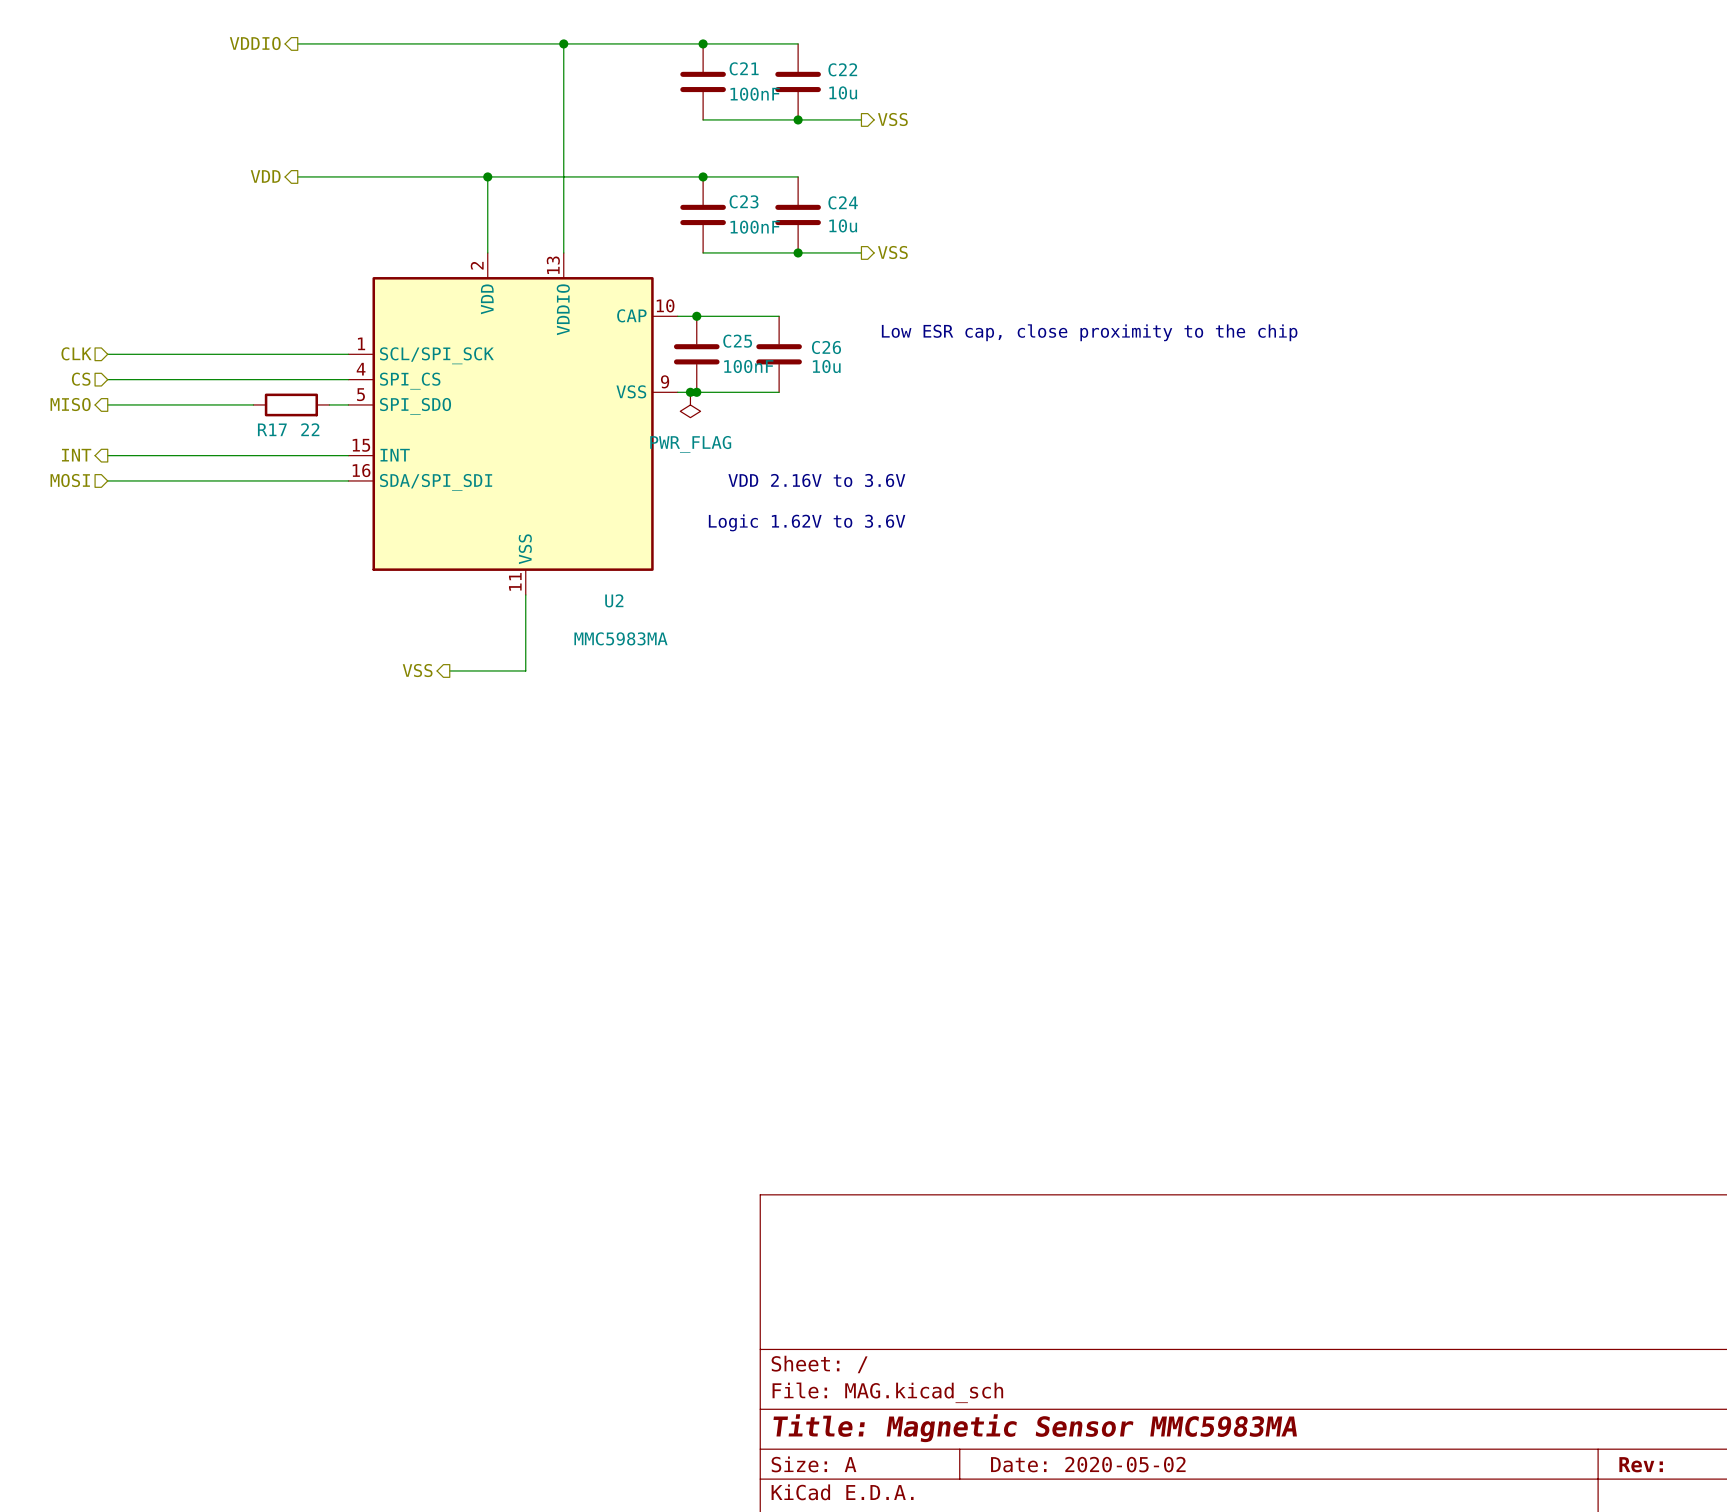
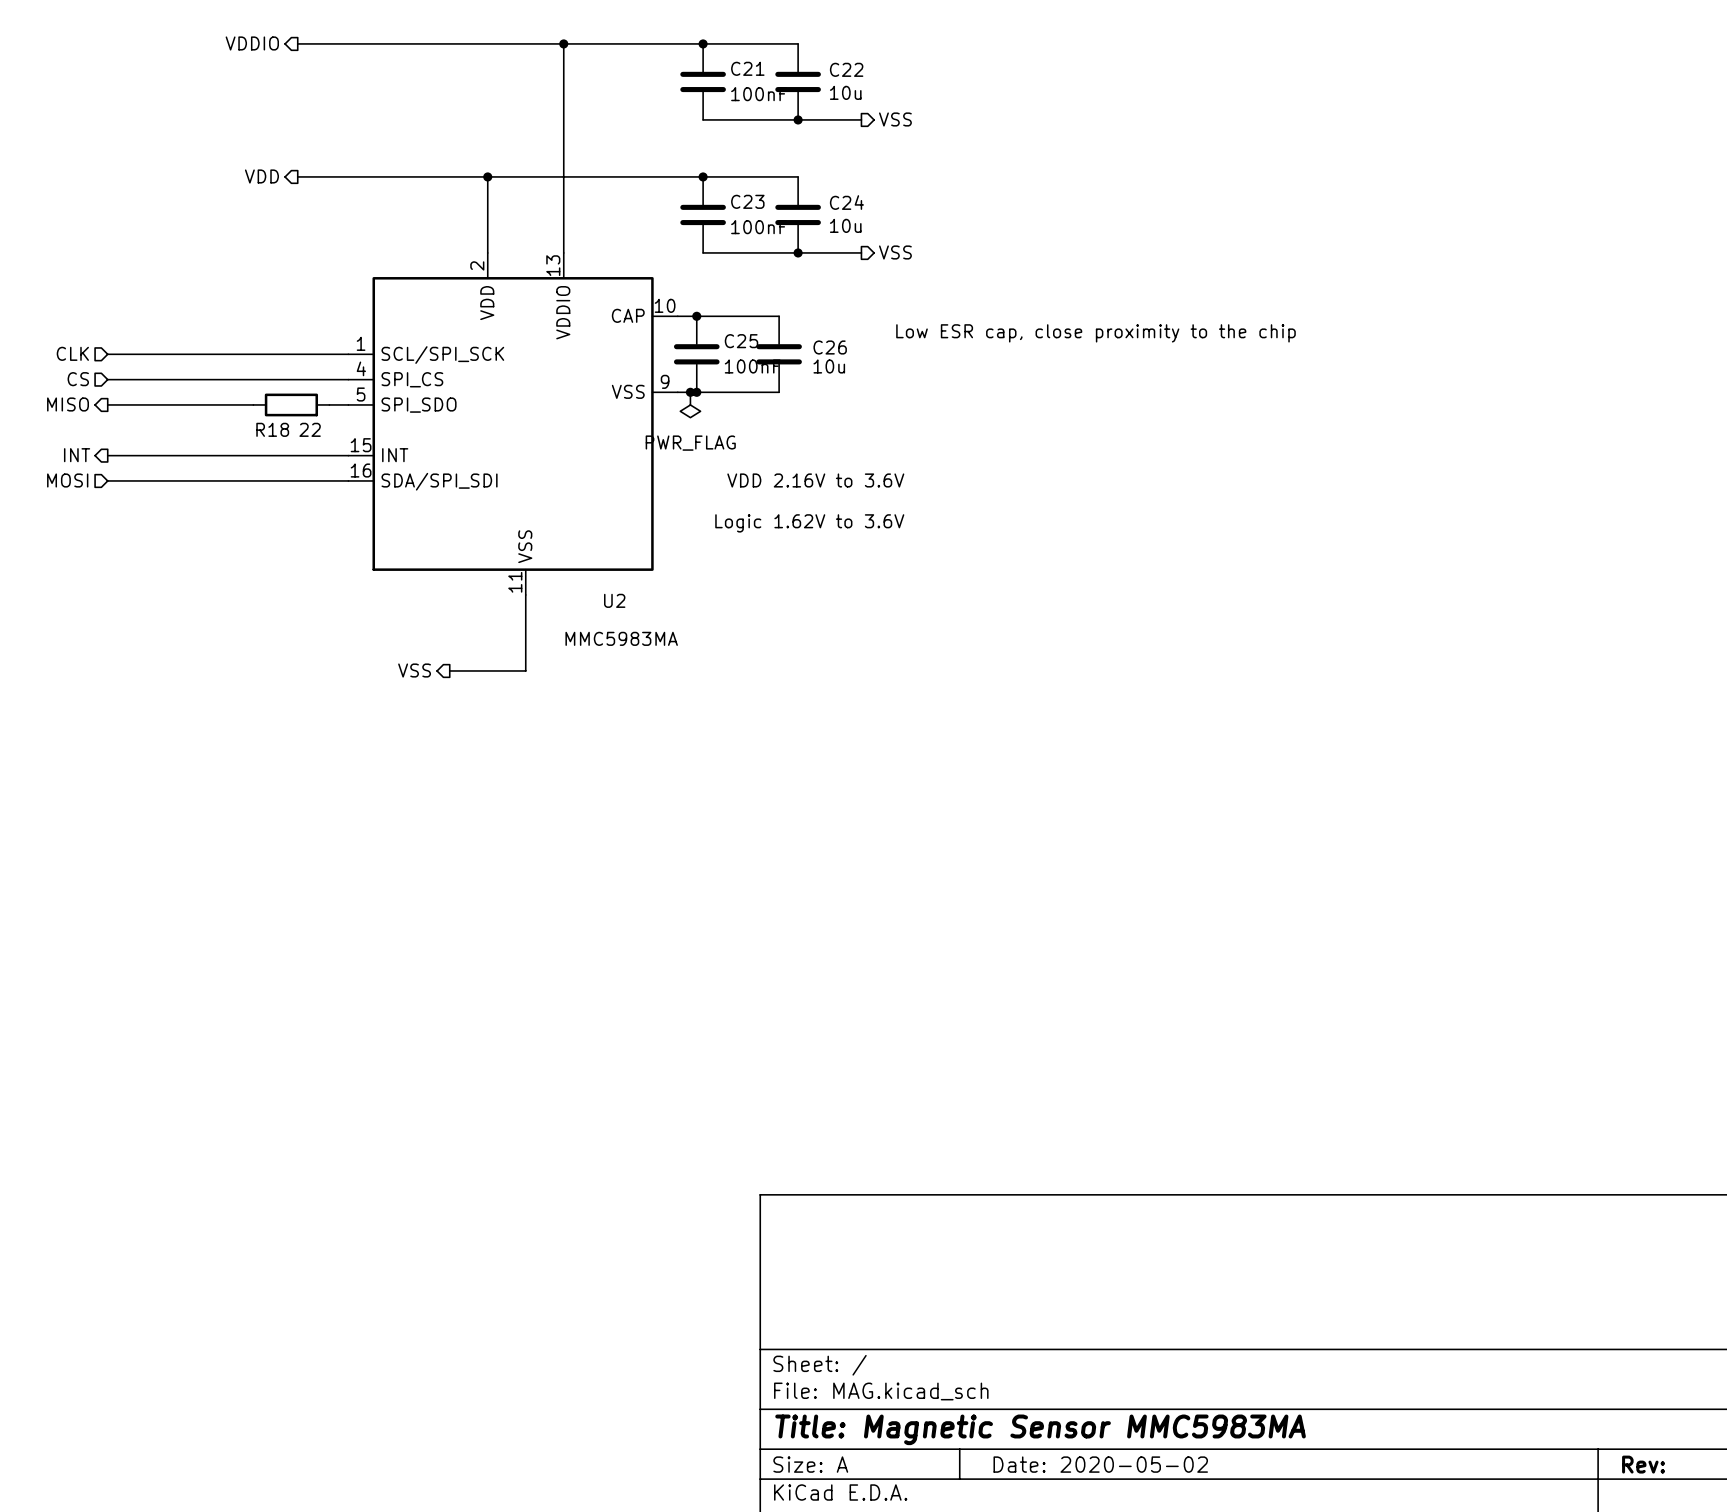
R17 name: R17 (272, 429) -> R18 (272, 429)

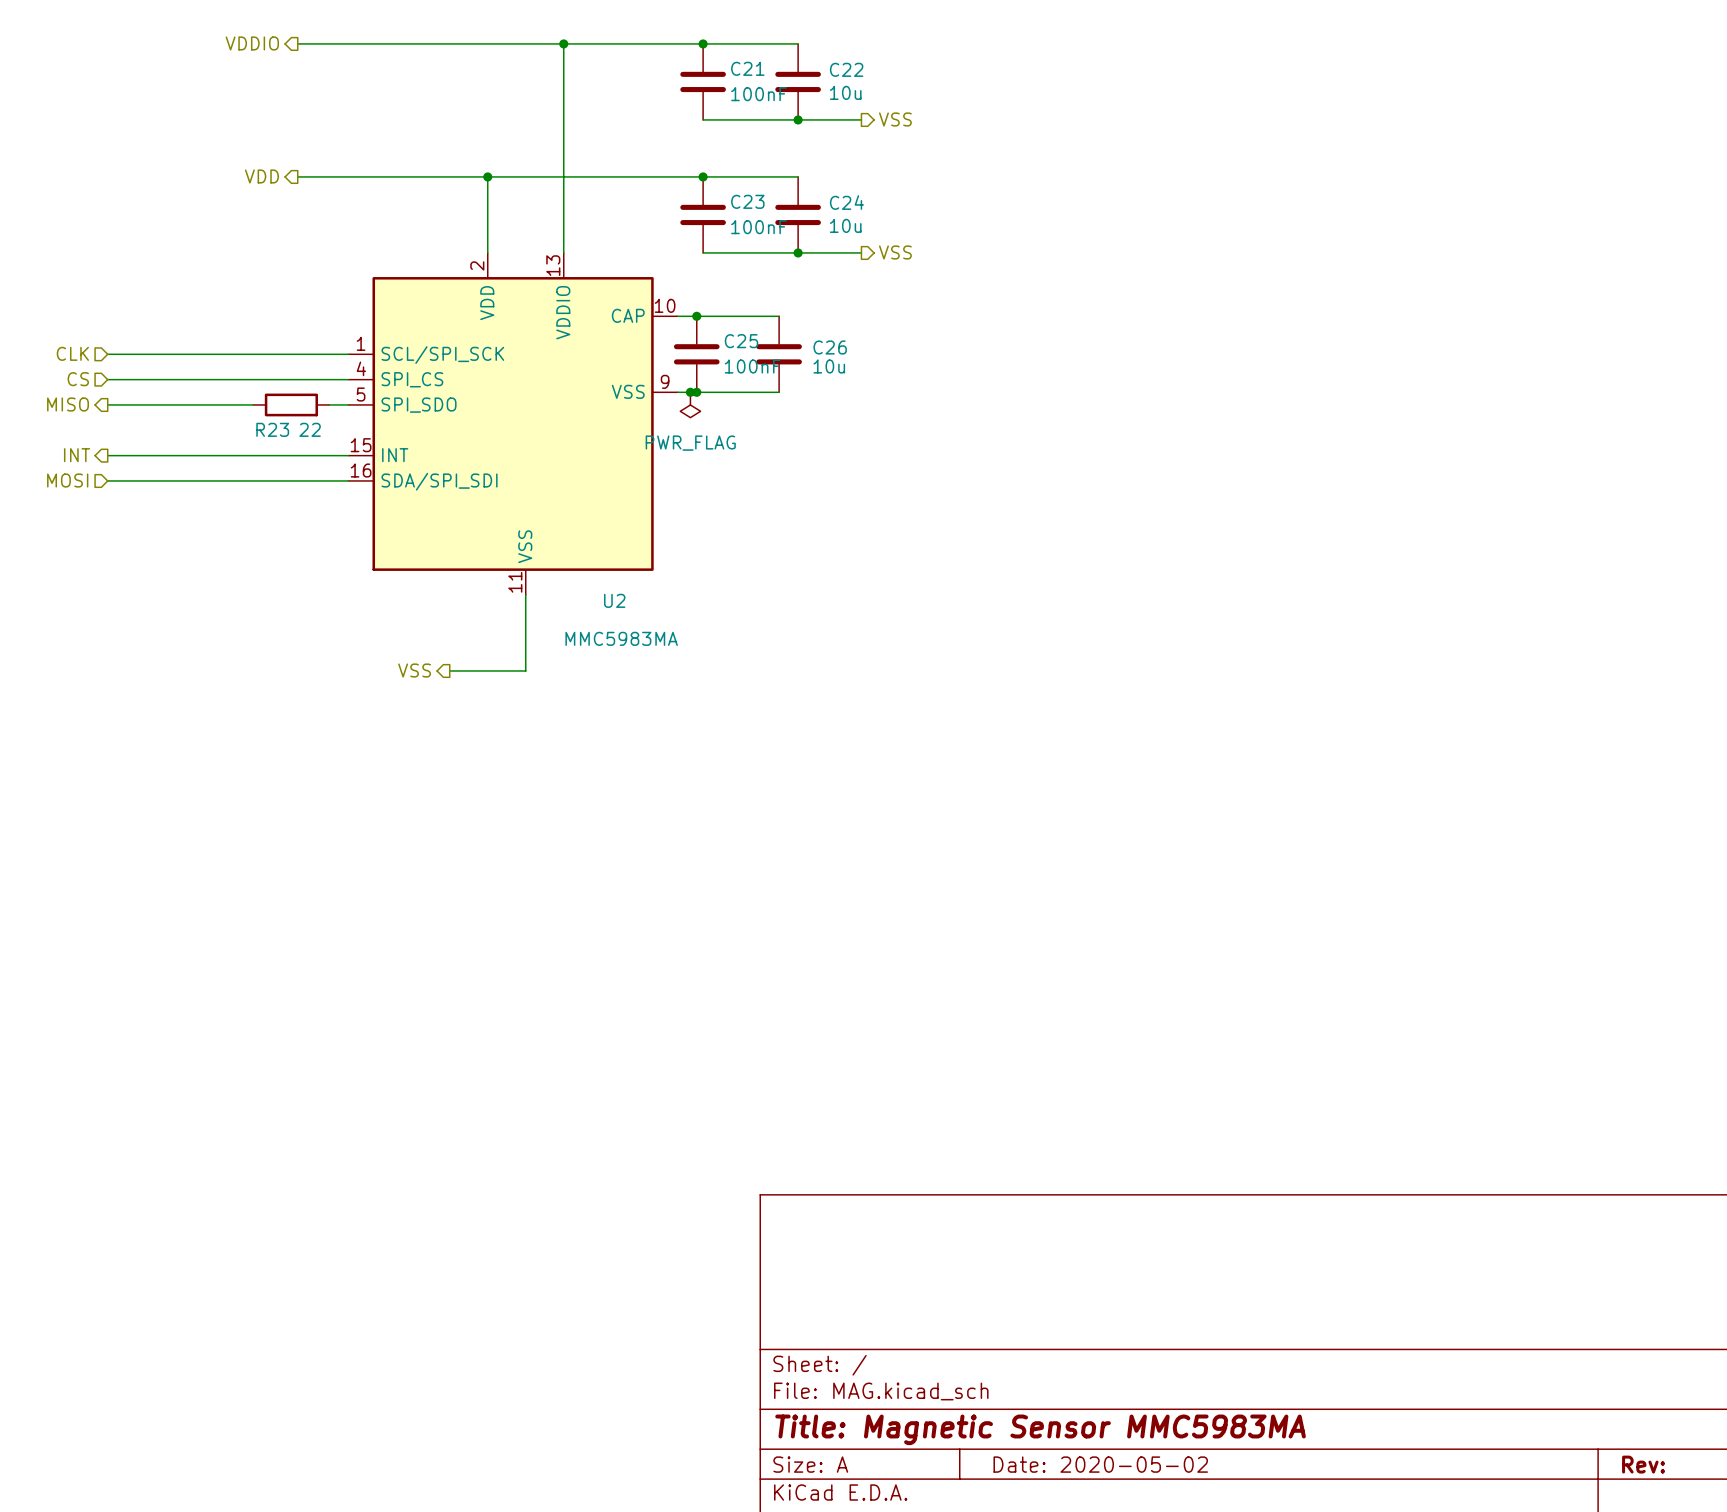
text: Low ESR cap, close proximity to the chip (1095, 333) -> none
R18 name: R18 (272, 429) -> R23 (272, 429)
text: VDD 2.16V to 3.6V (815, 480) -> none
text: Logic 1.62V to 3.6V (809, 523) -> none

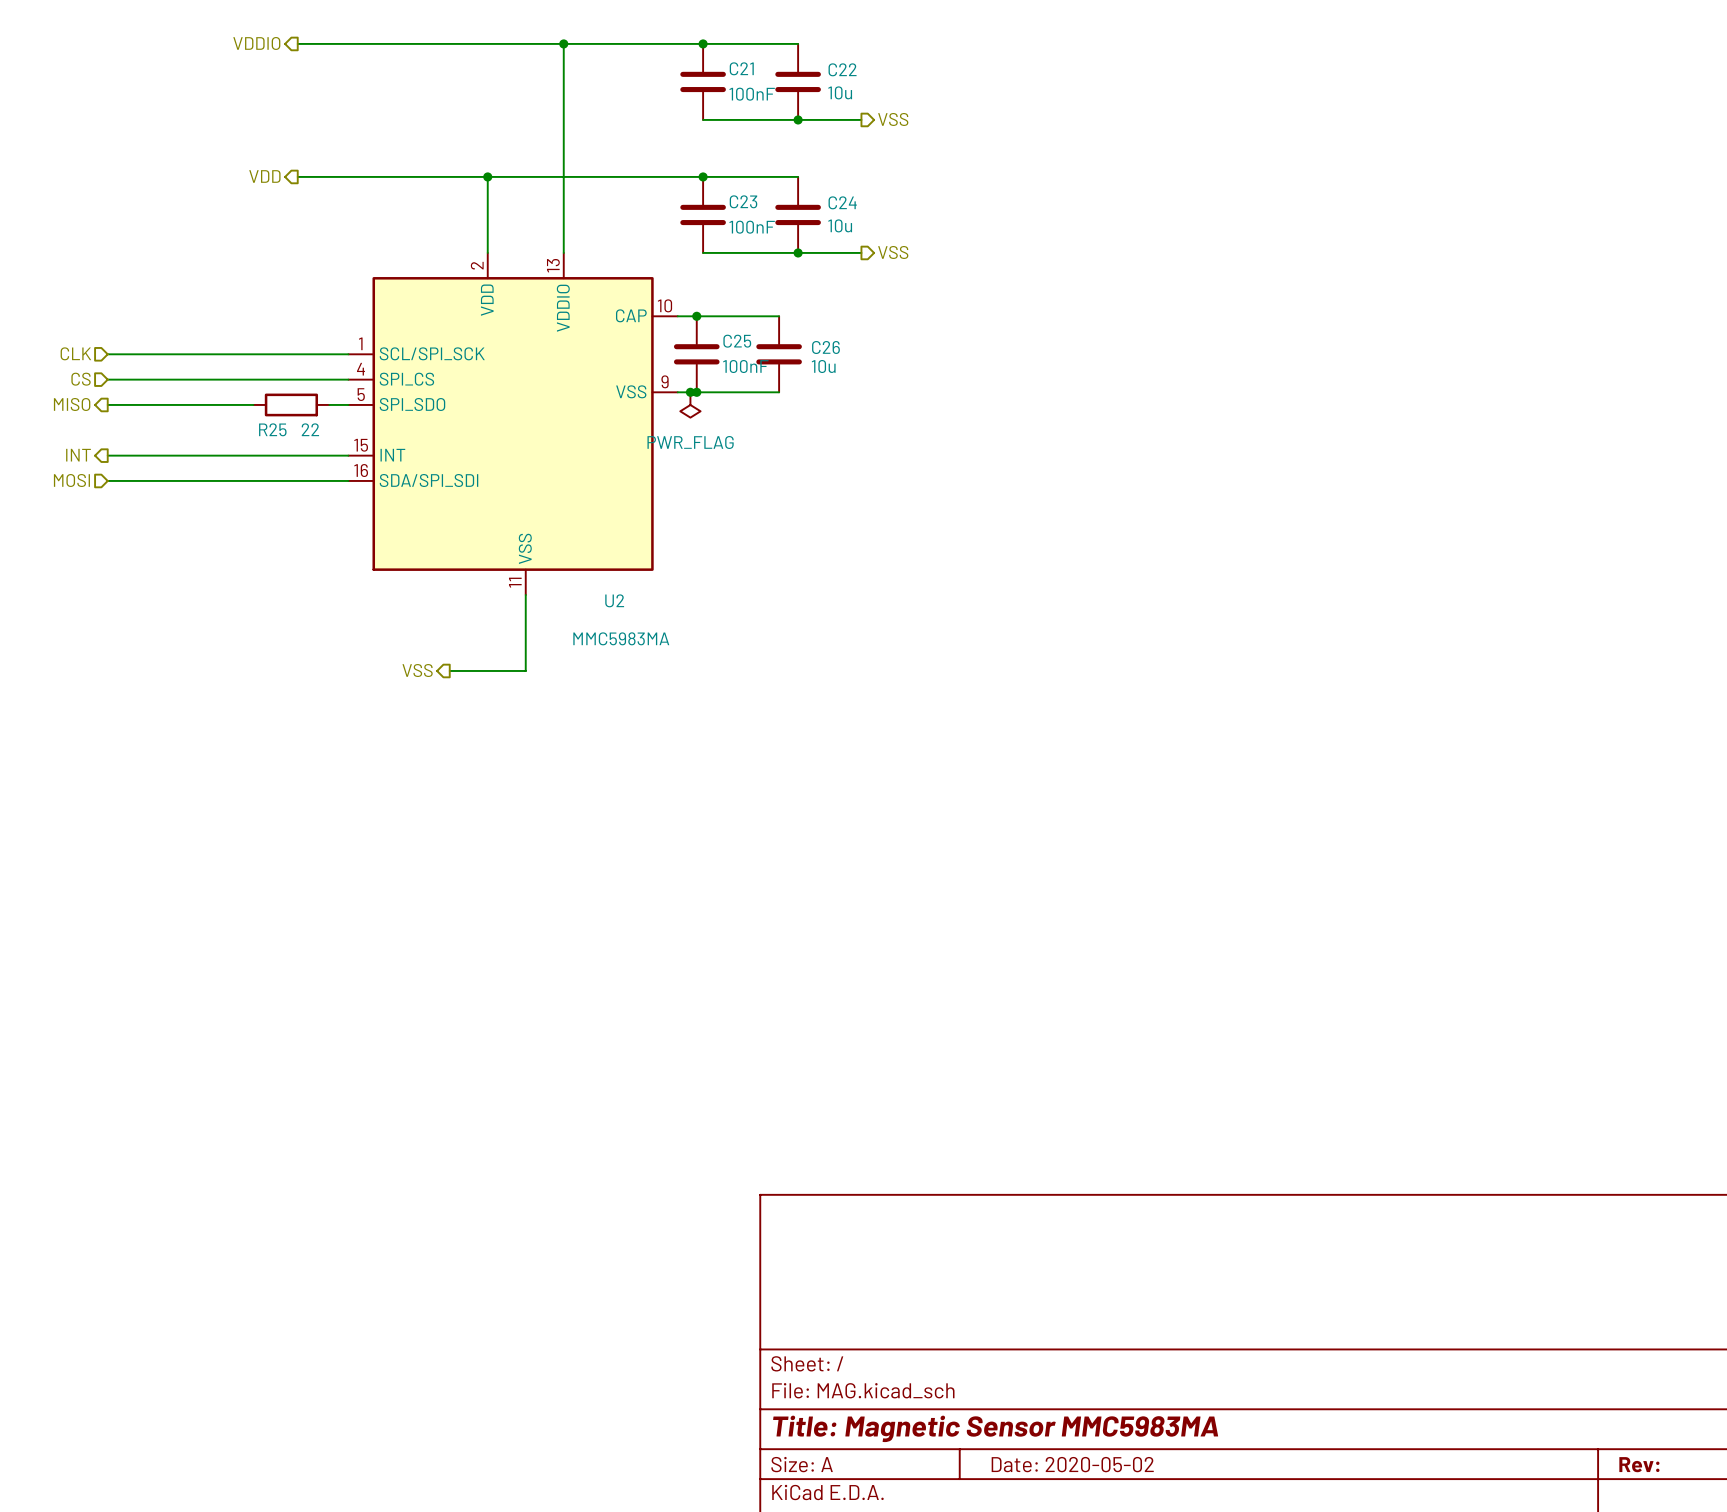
R23 name: R23 (272, 429) -> R25 (272, 429)

